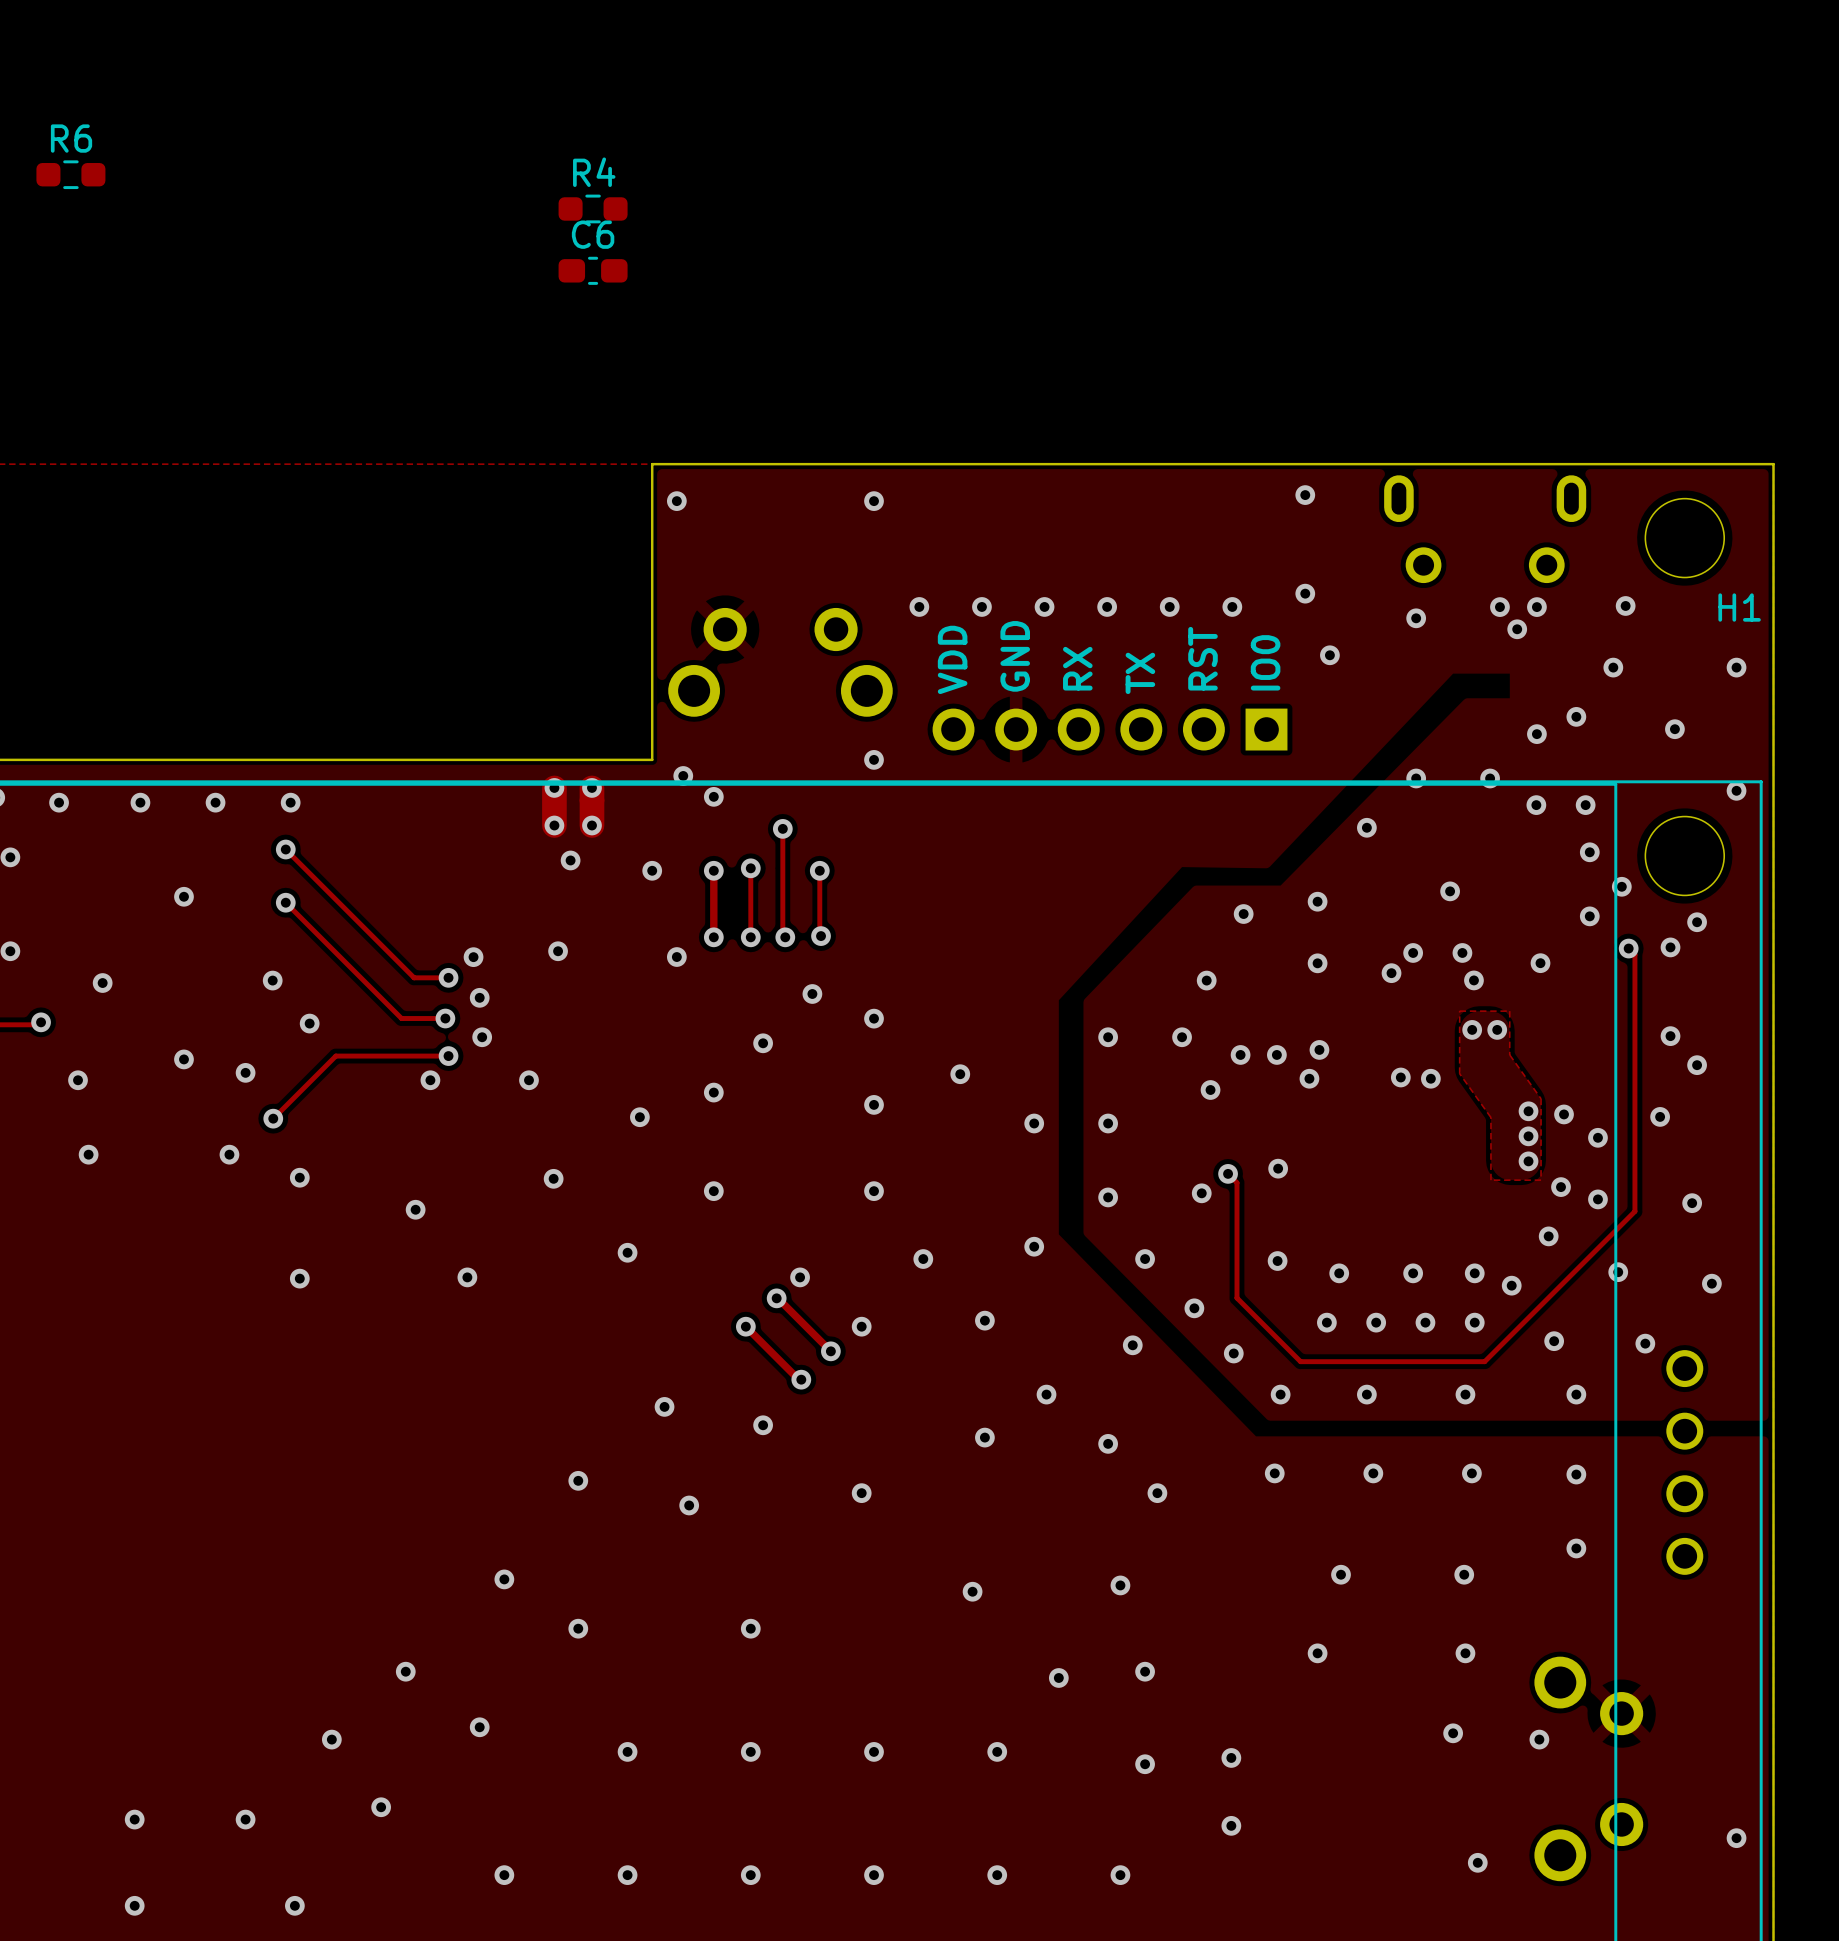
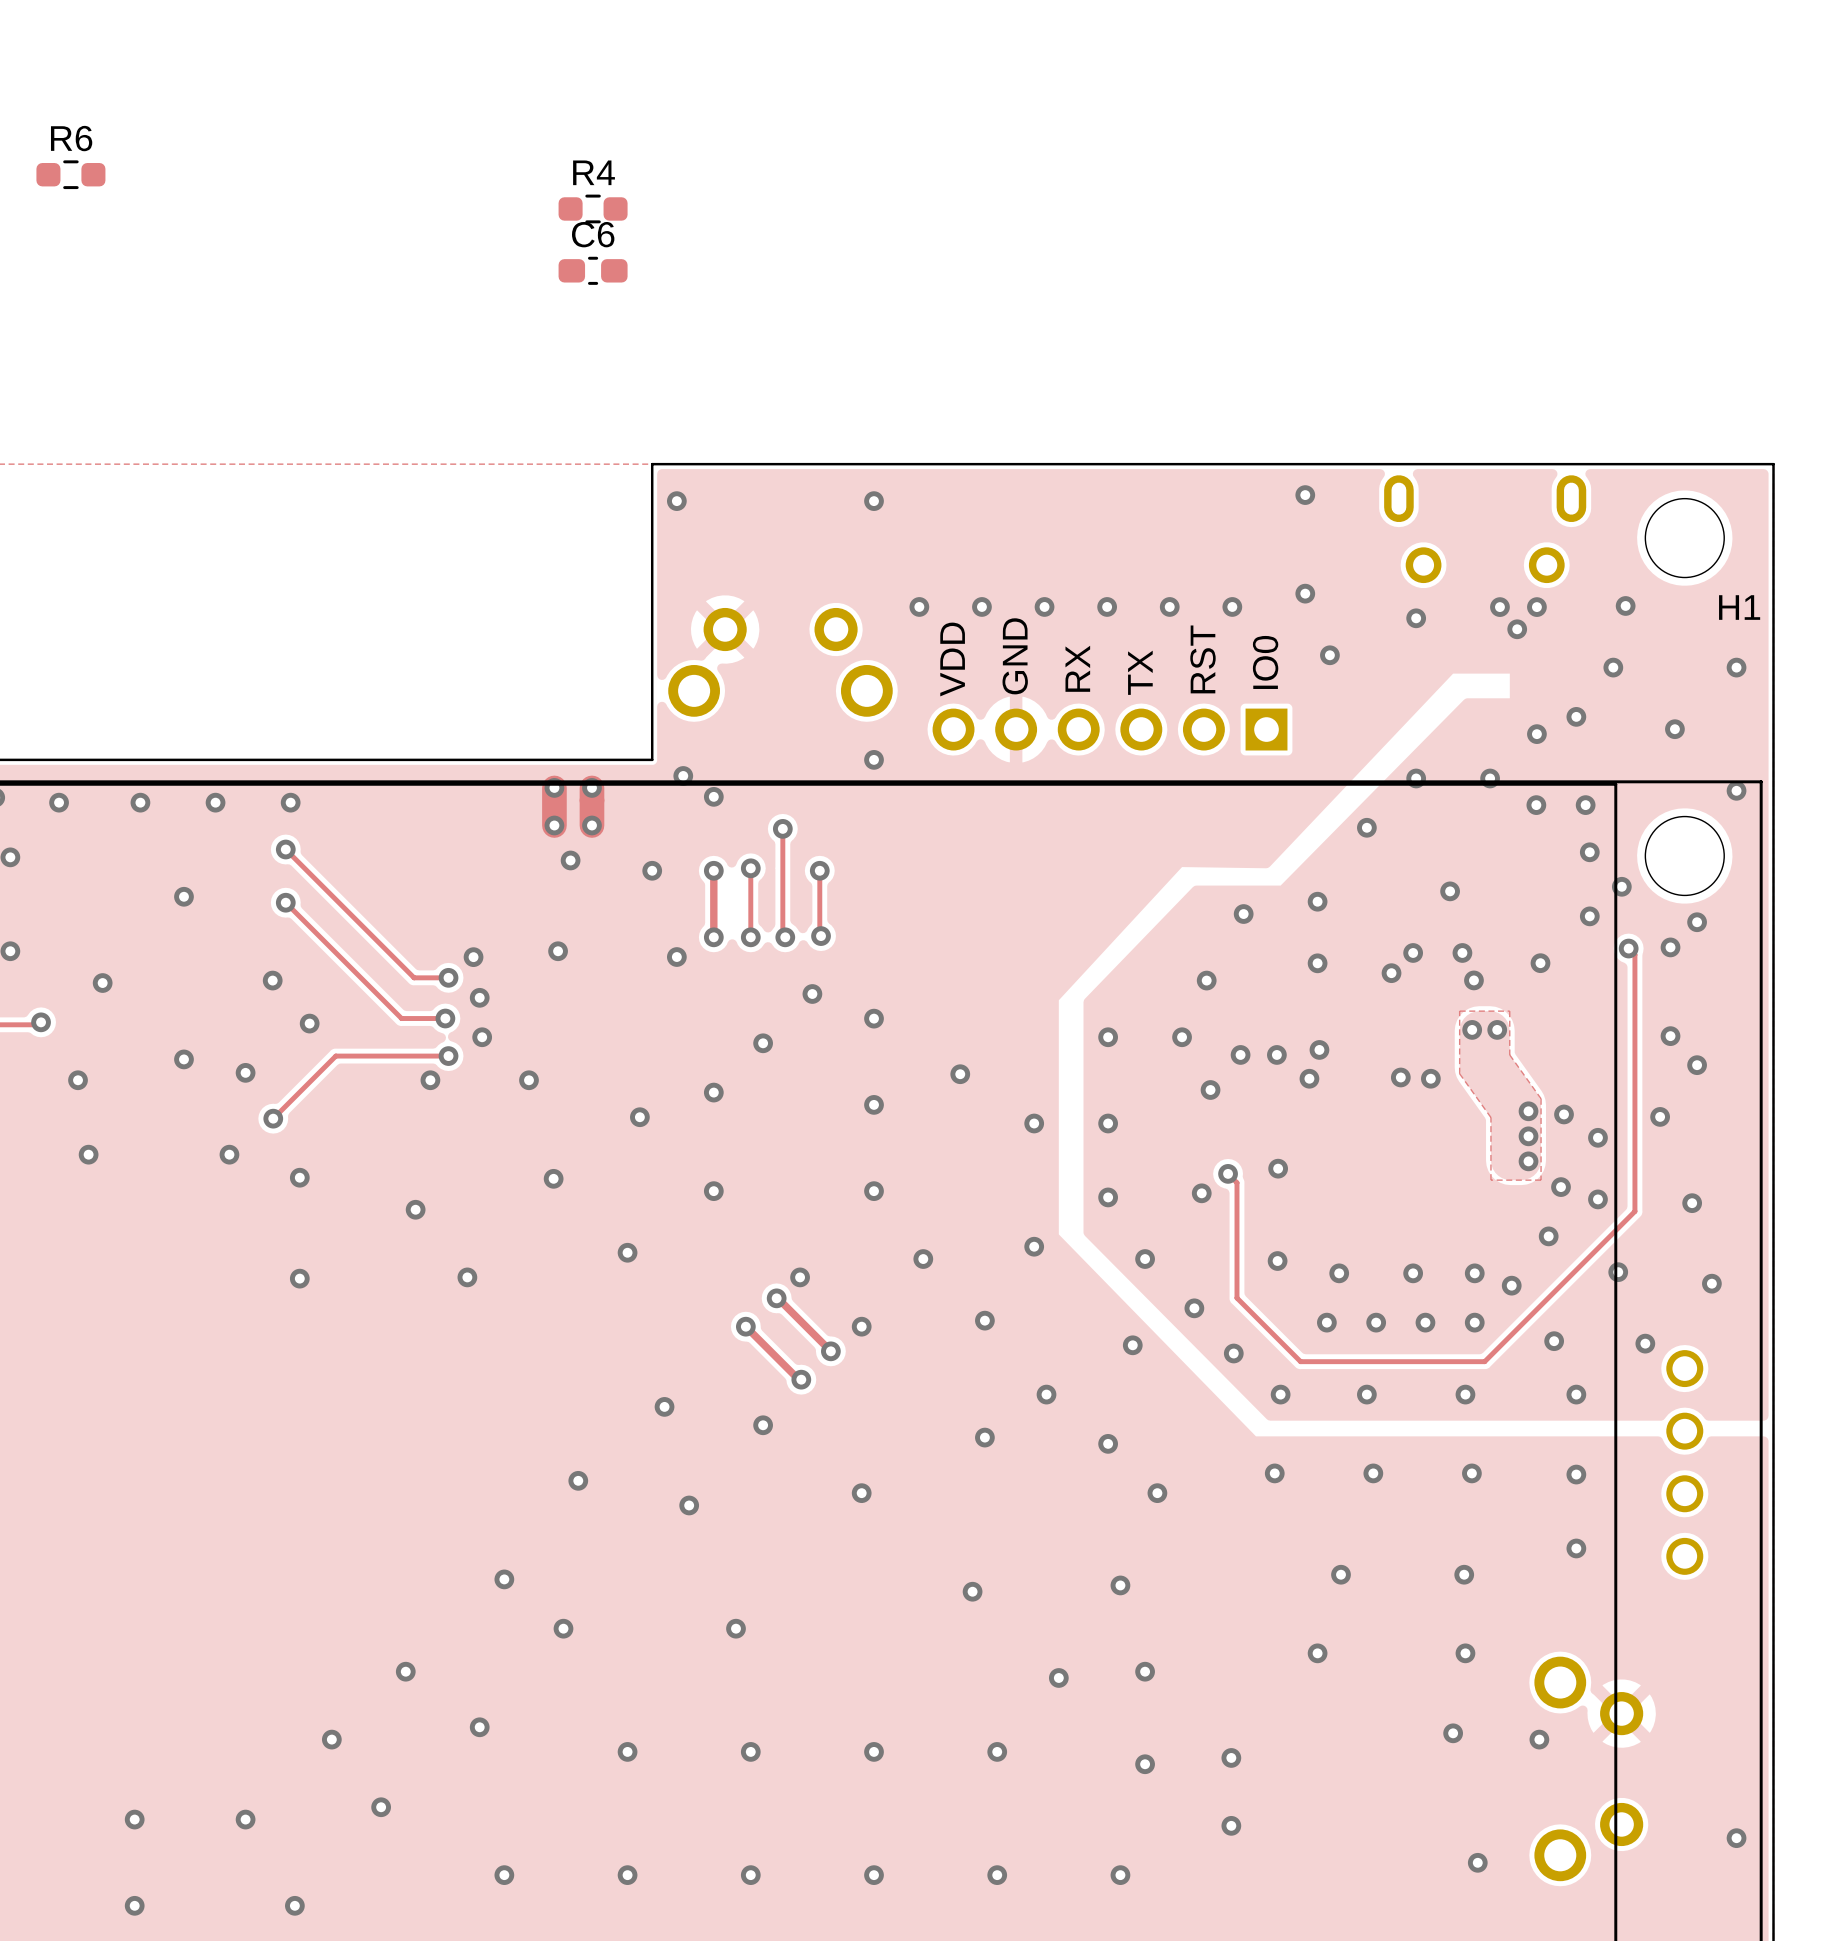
via position: (578, 1628) -> (563, 1628)
via position: (750, 1628) -> (736, 1628)

